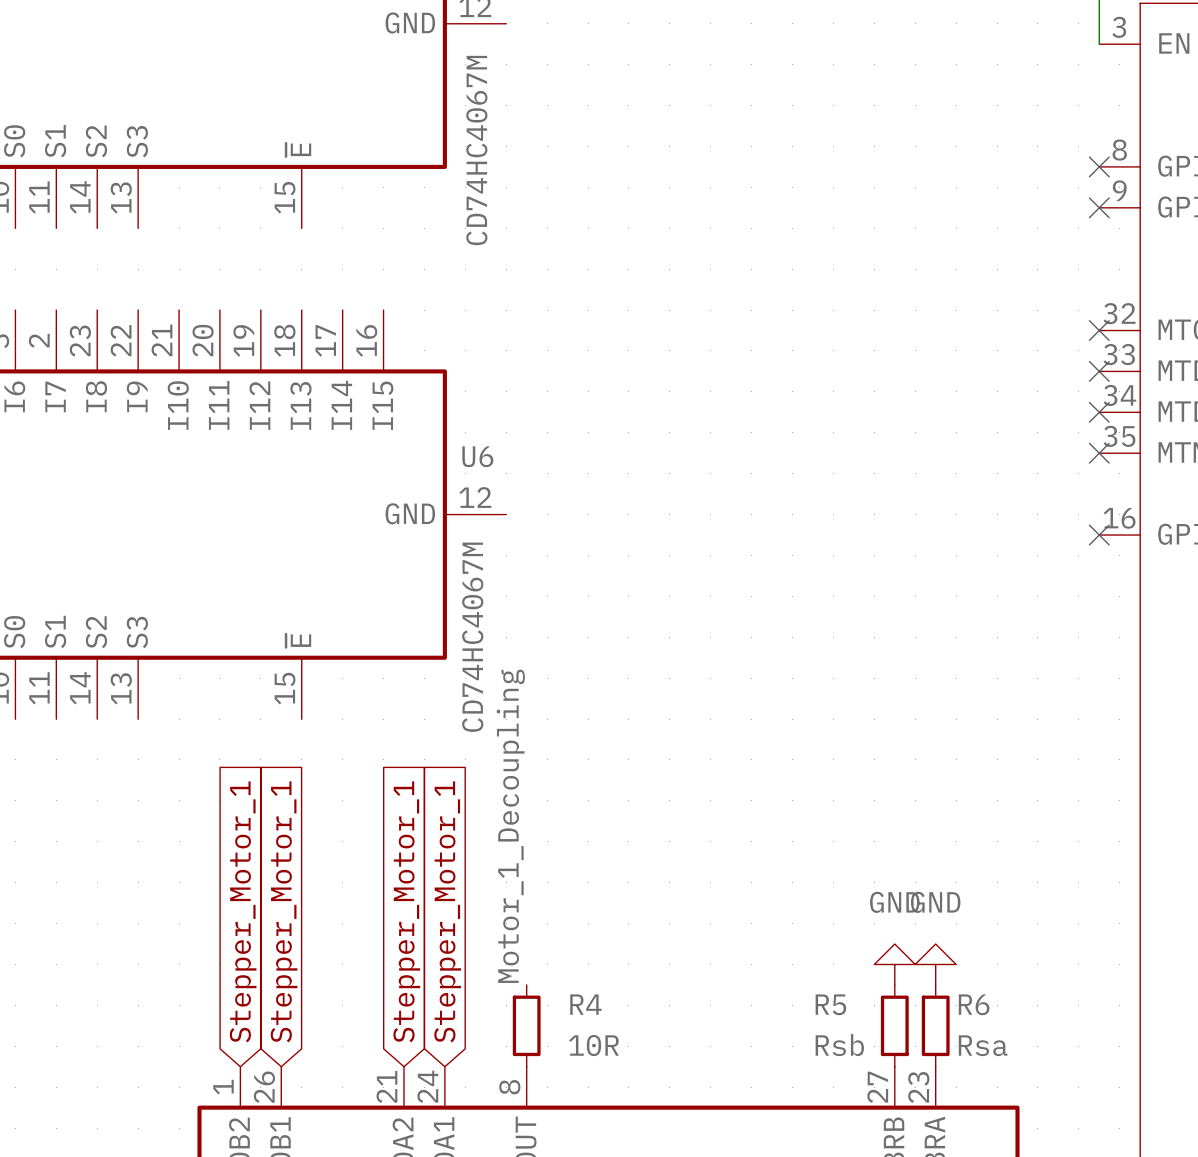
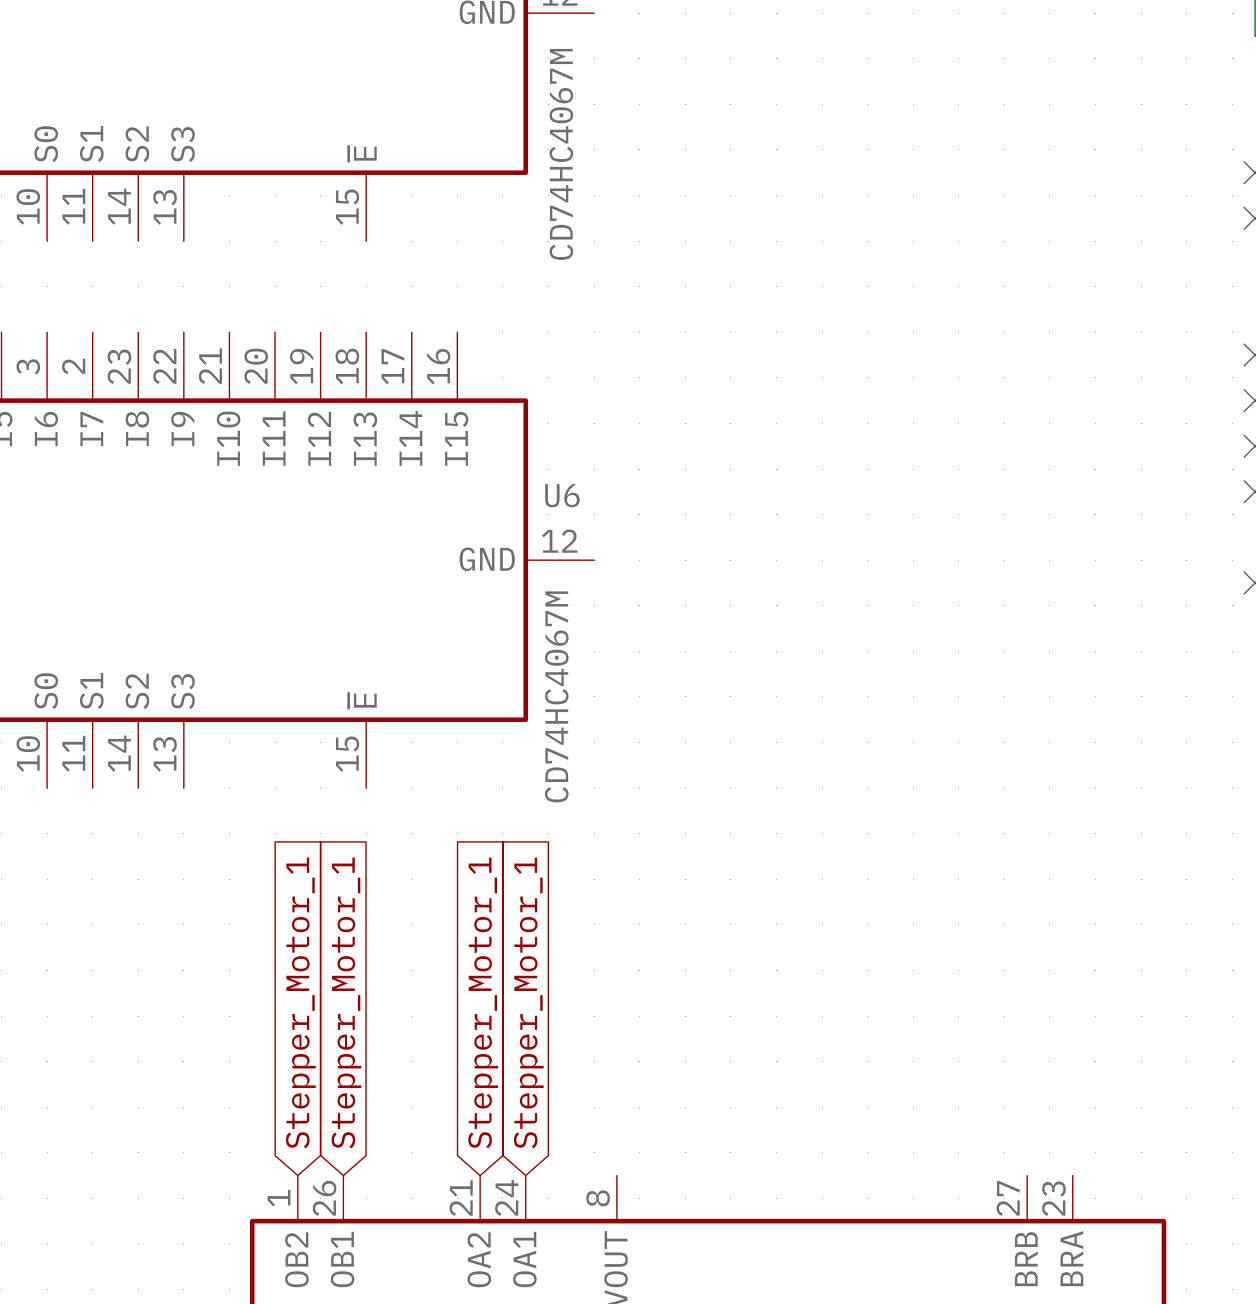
label: Motor_1_Decoupling (510, 826) -> none
power symbol: GND (894, 964) -> none
power symbol: GND (935, 964) -> none
R4: 10R (526, 1025) -> none
R5: Rsb (894, 1025) -> none
R6: Rsa (935, 1025) -> none

